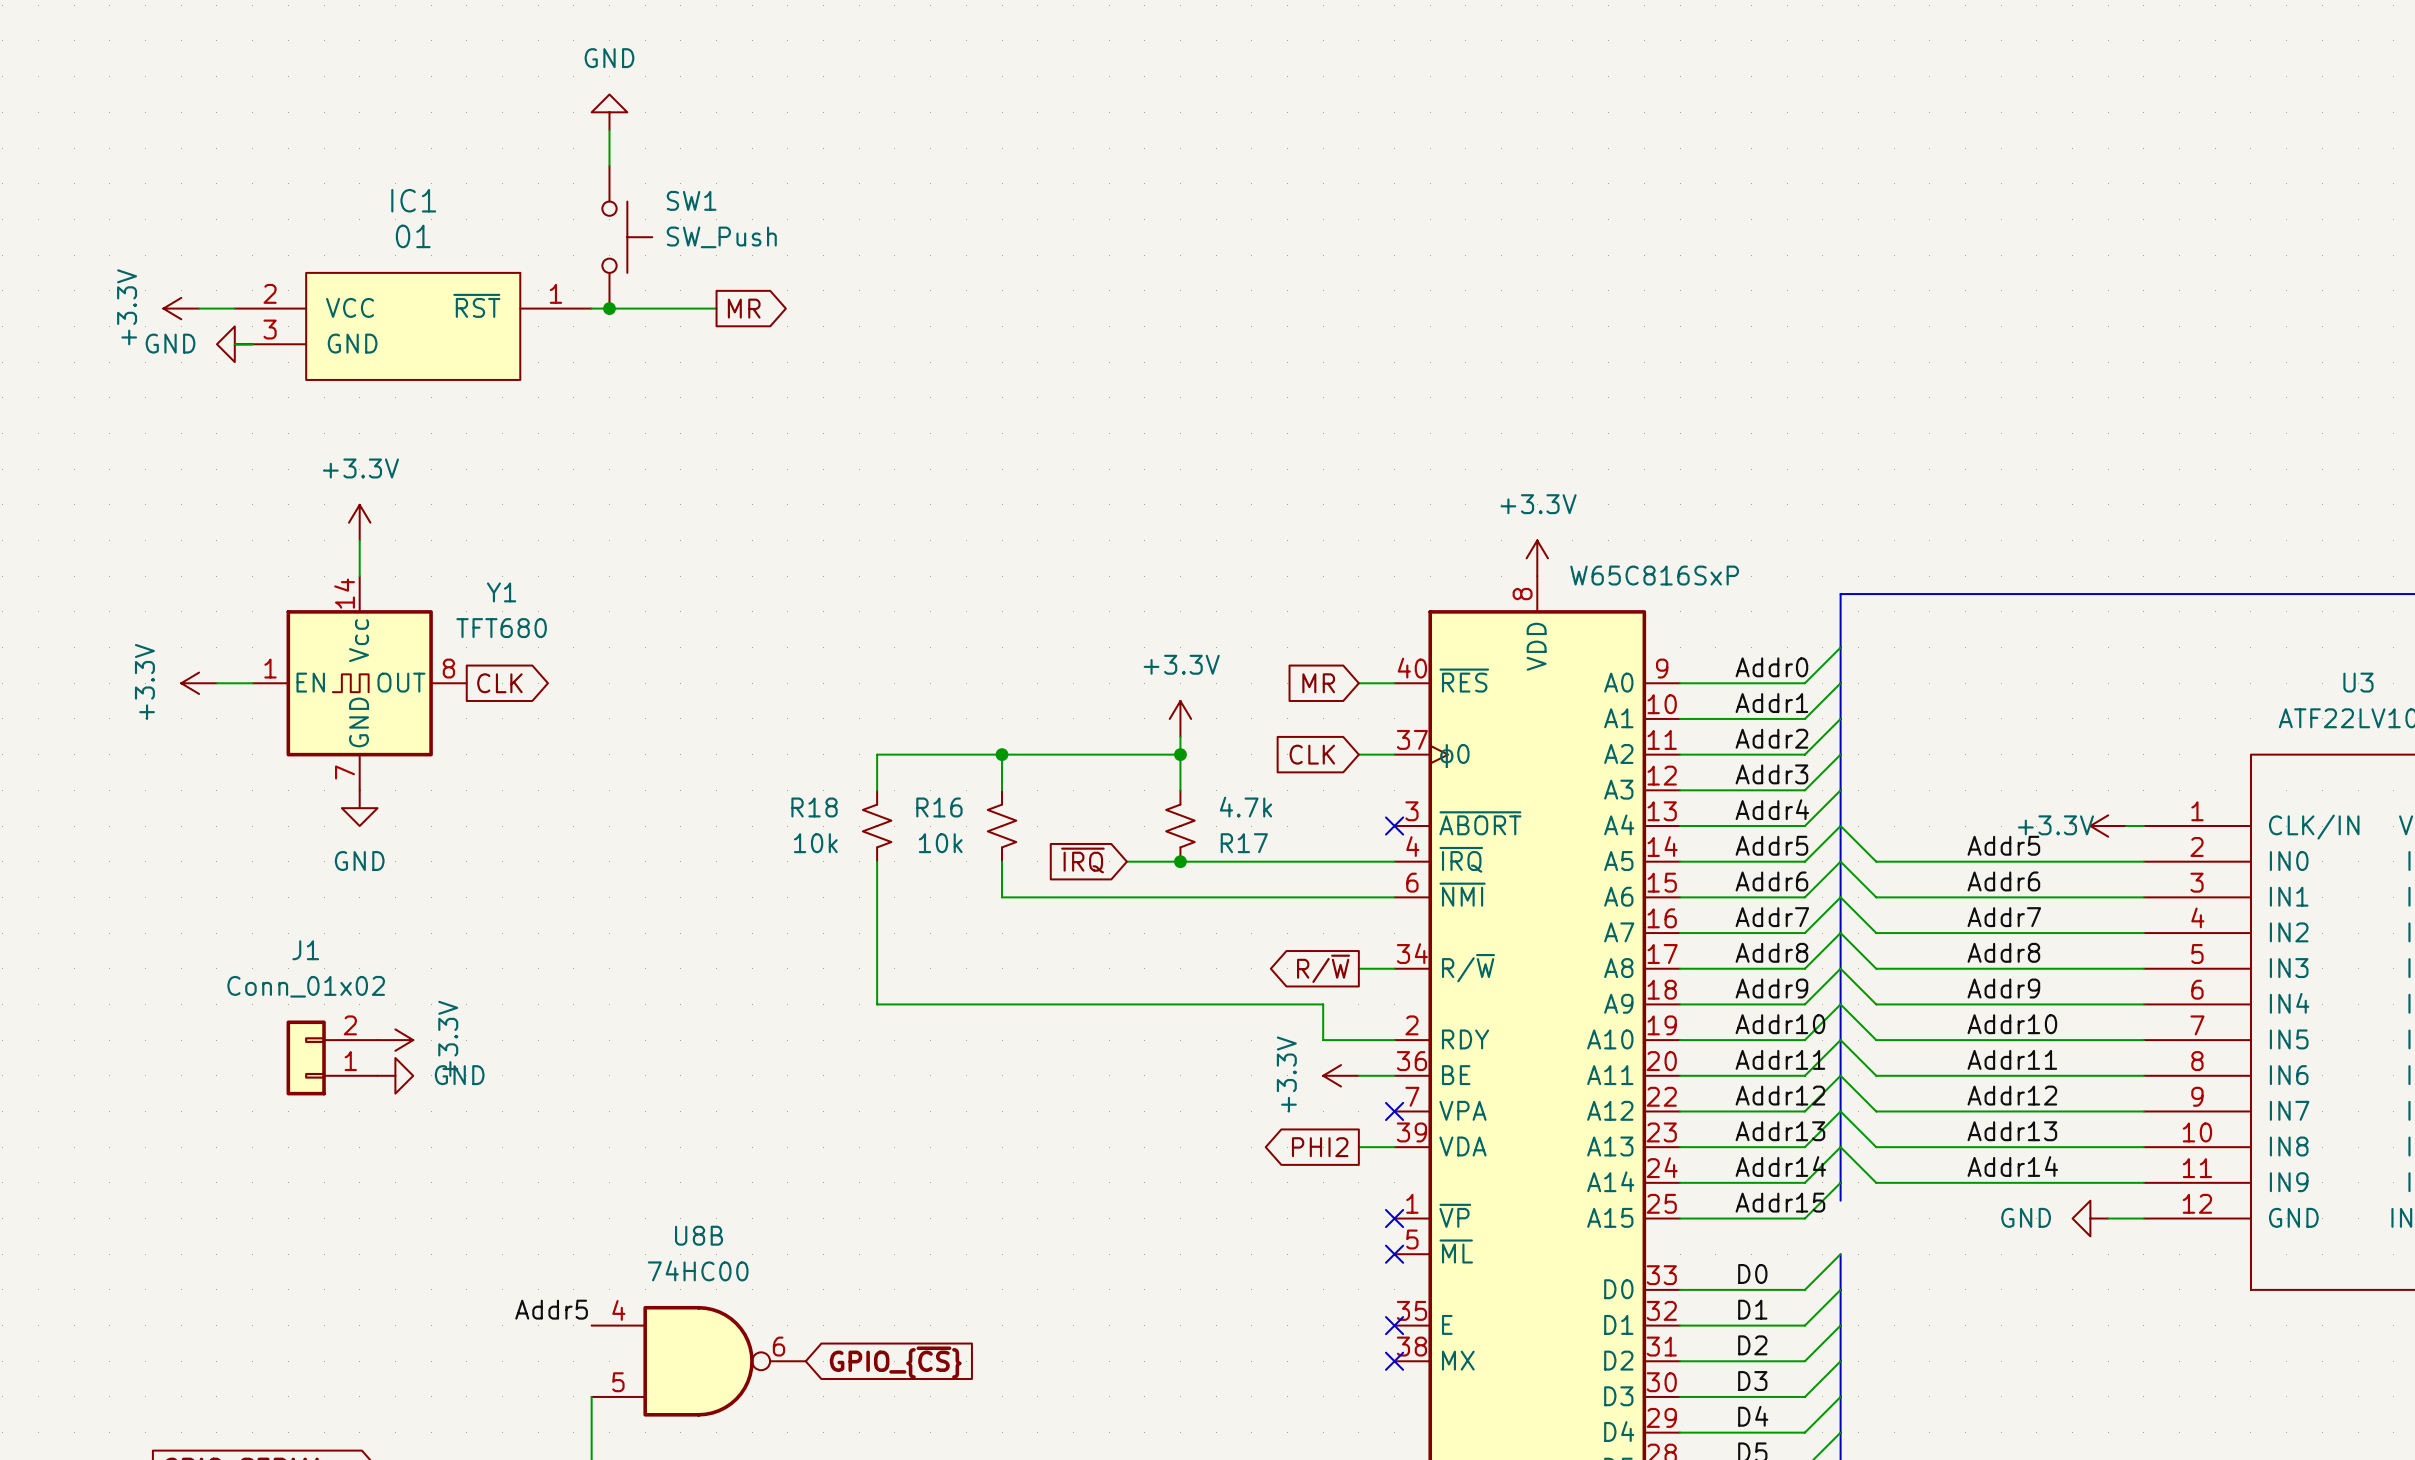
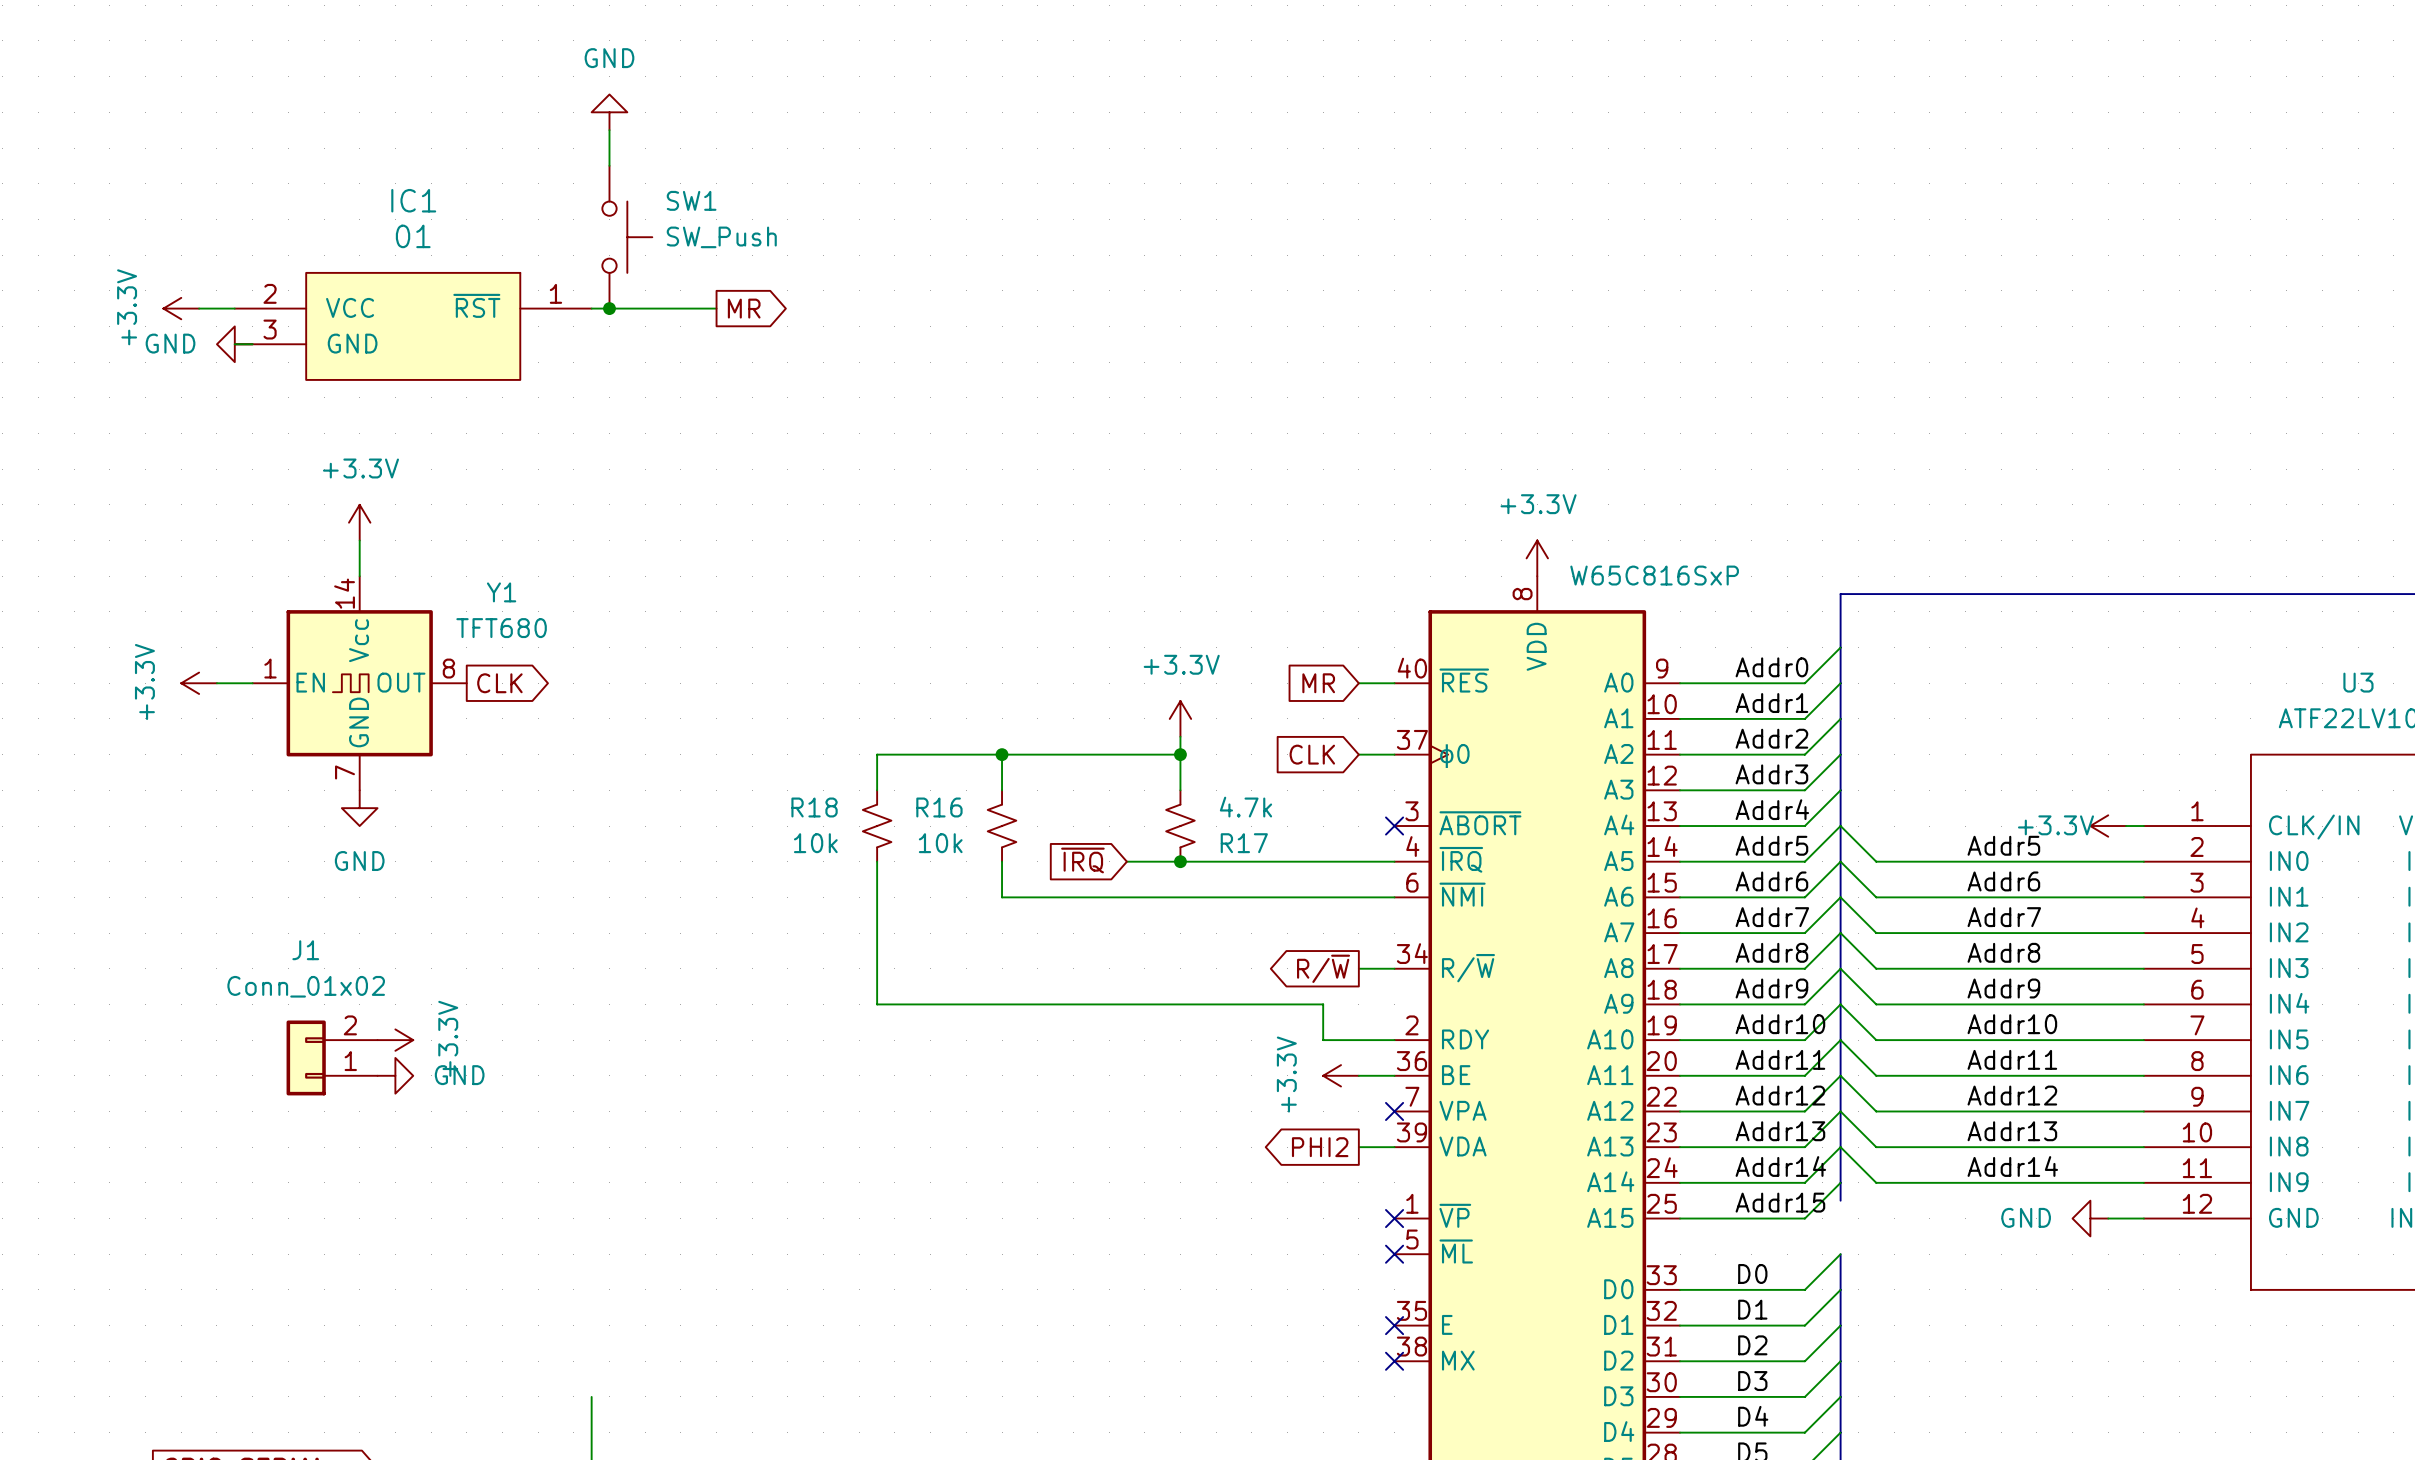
label: Addr5 (551, 1309) -> none
U8B: 74HC00 (698, 1361) -> none
global label: GPIO_{~{CS}} (895, 1362) -> none

